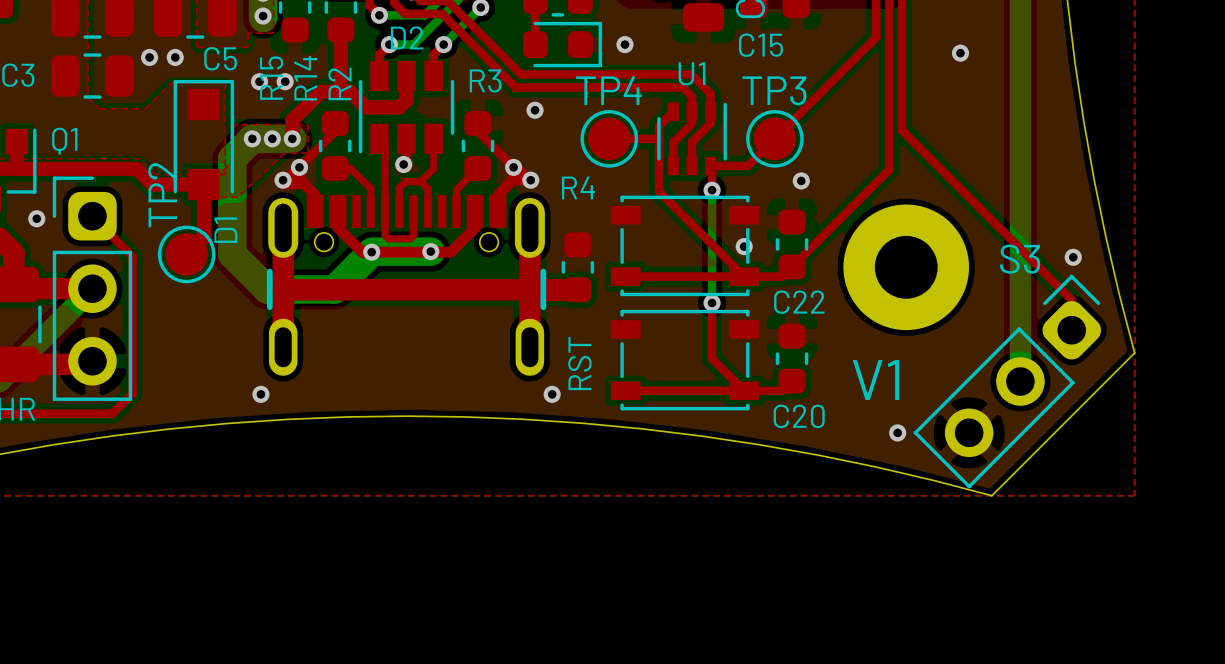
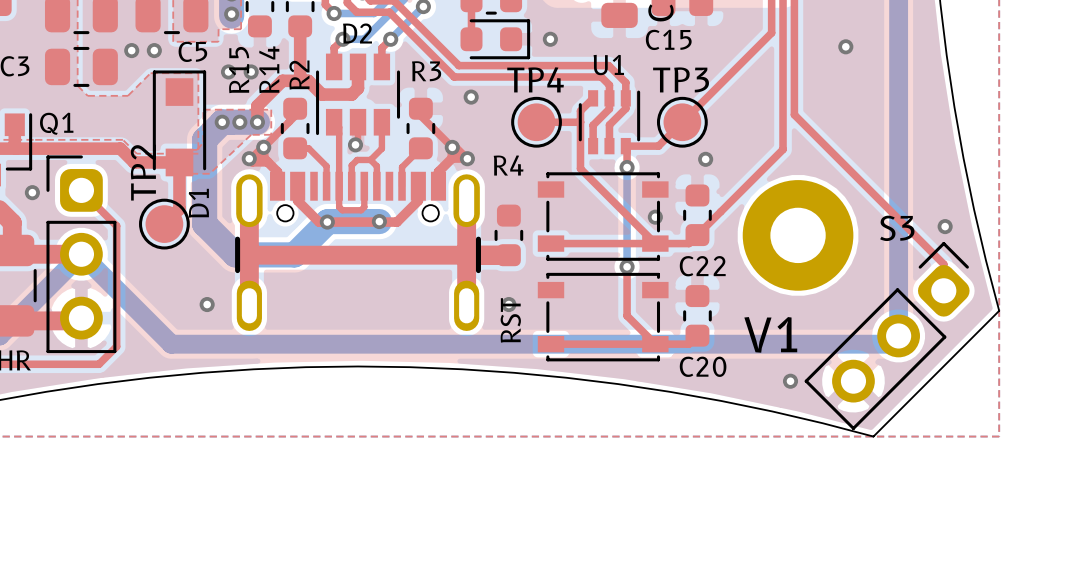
bottom track: none -> (81, 254) (171, 344) (890, 344) (898, 335)
via position: (260, 394) -> (207, 304)
via position: (552, 394) -> (508, 304)

